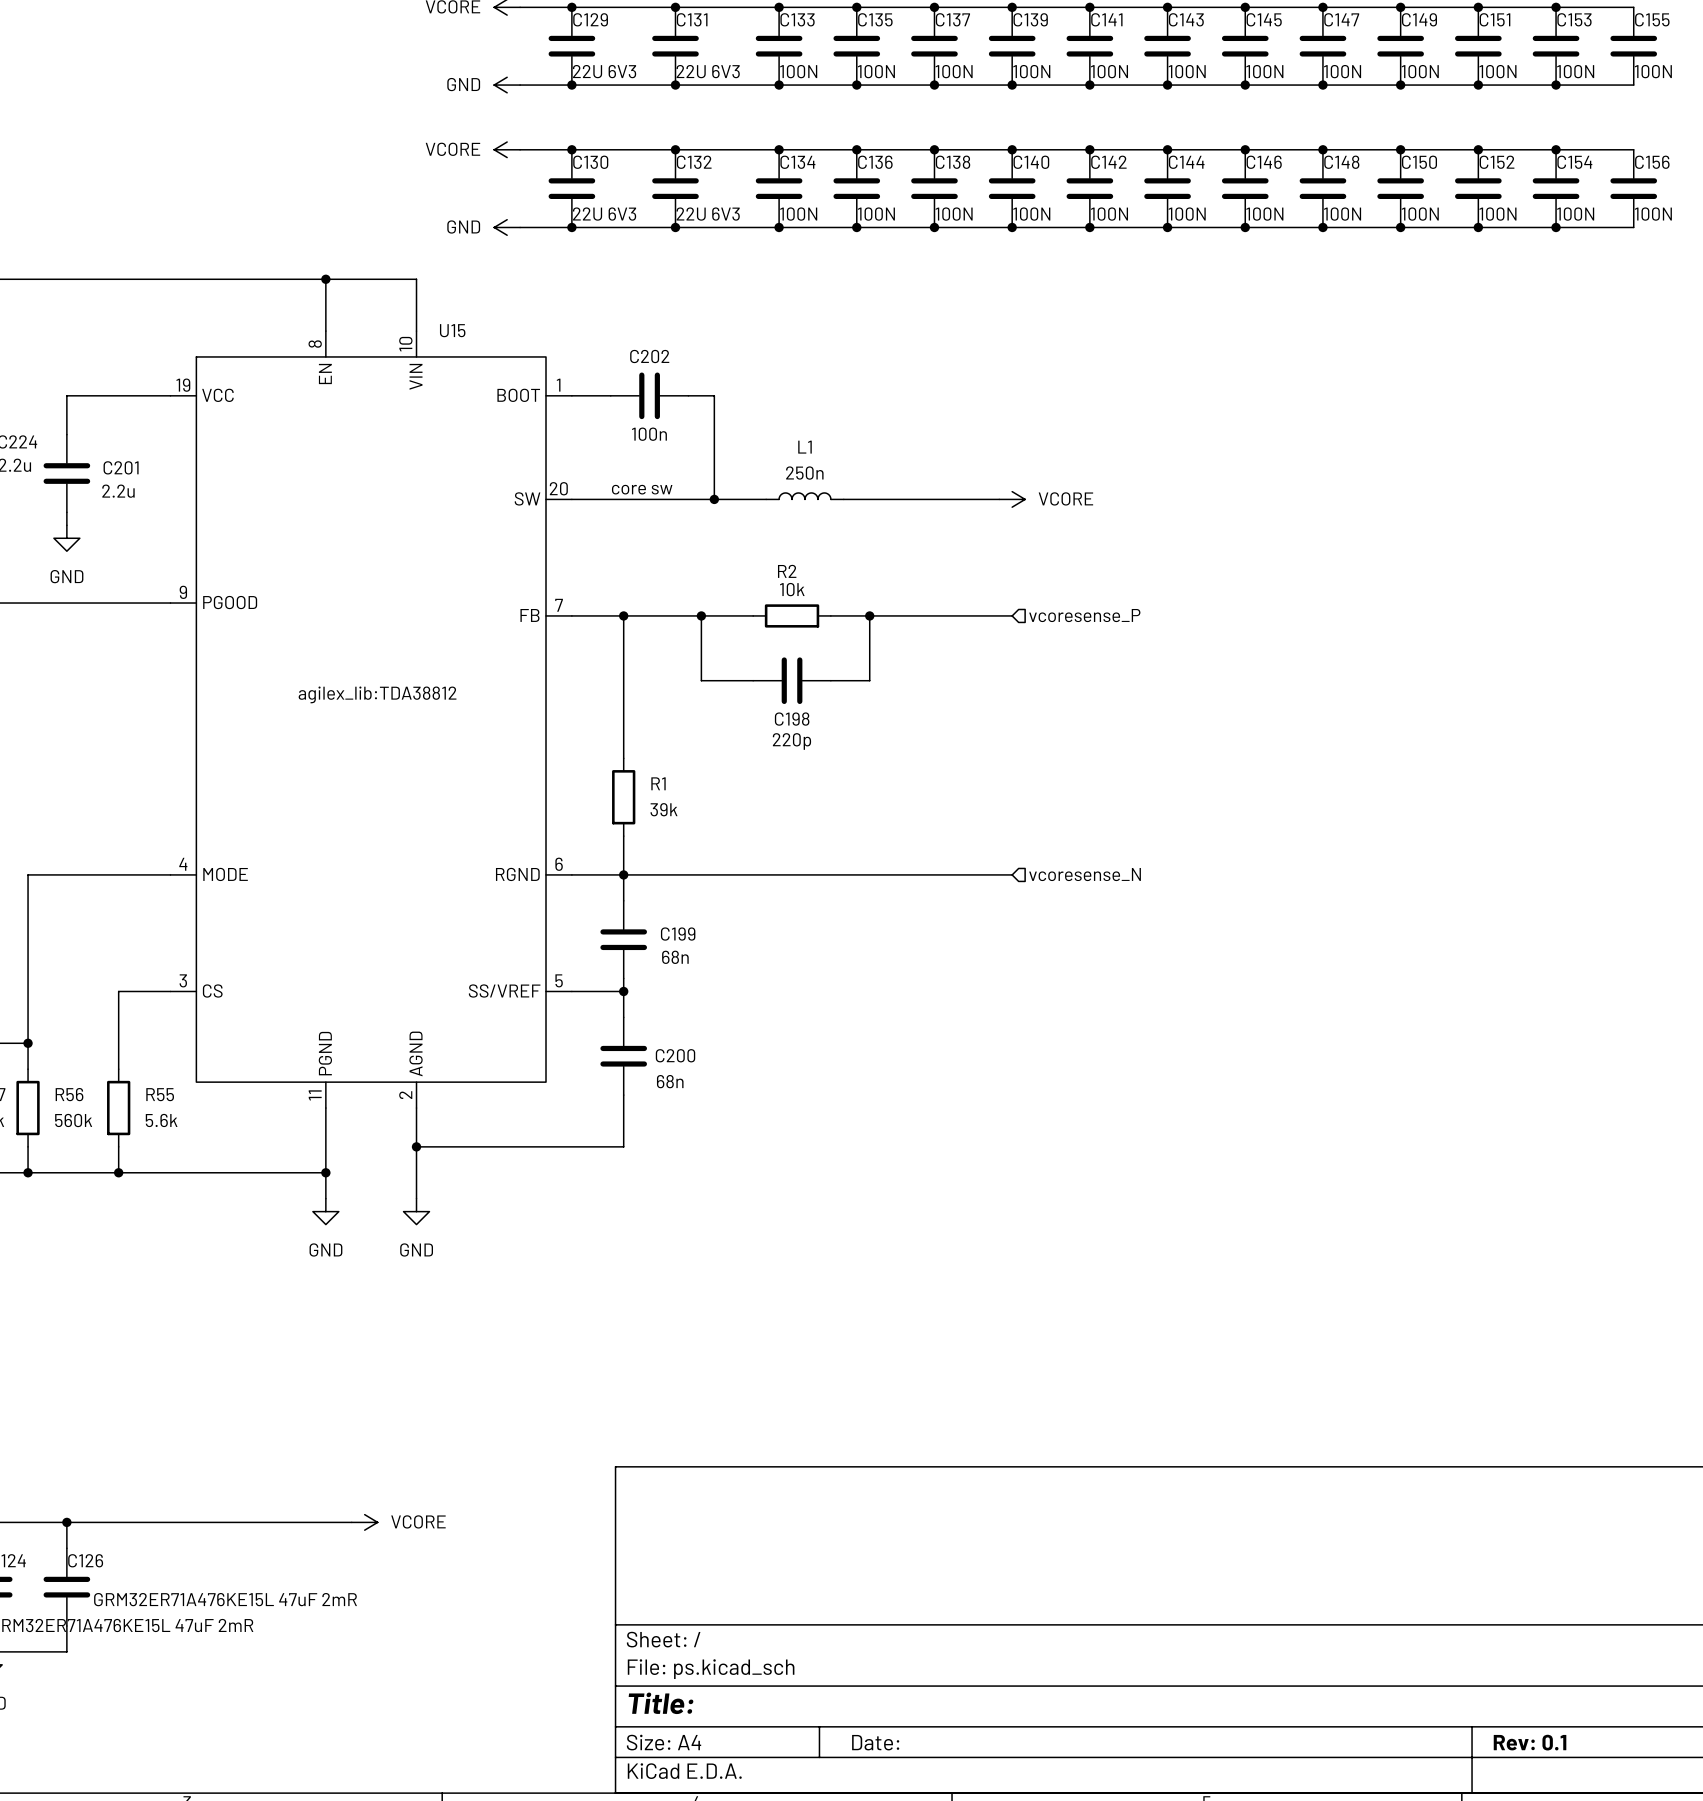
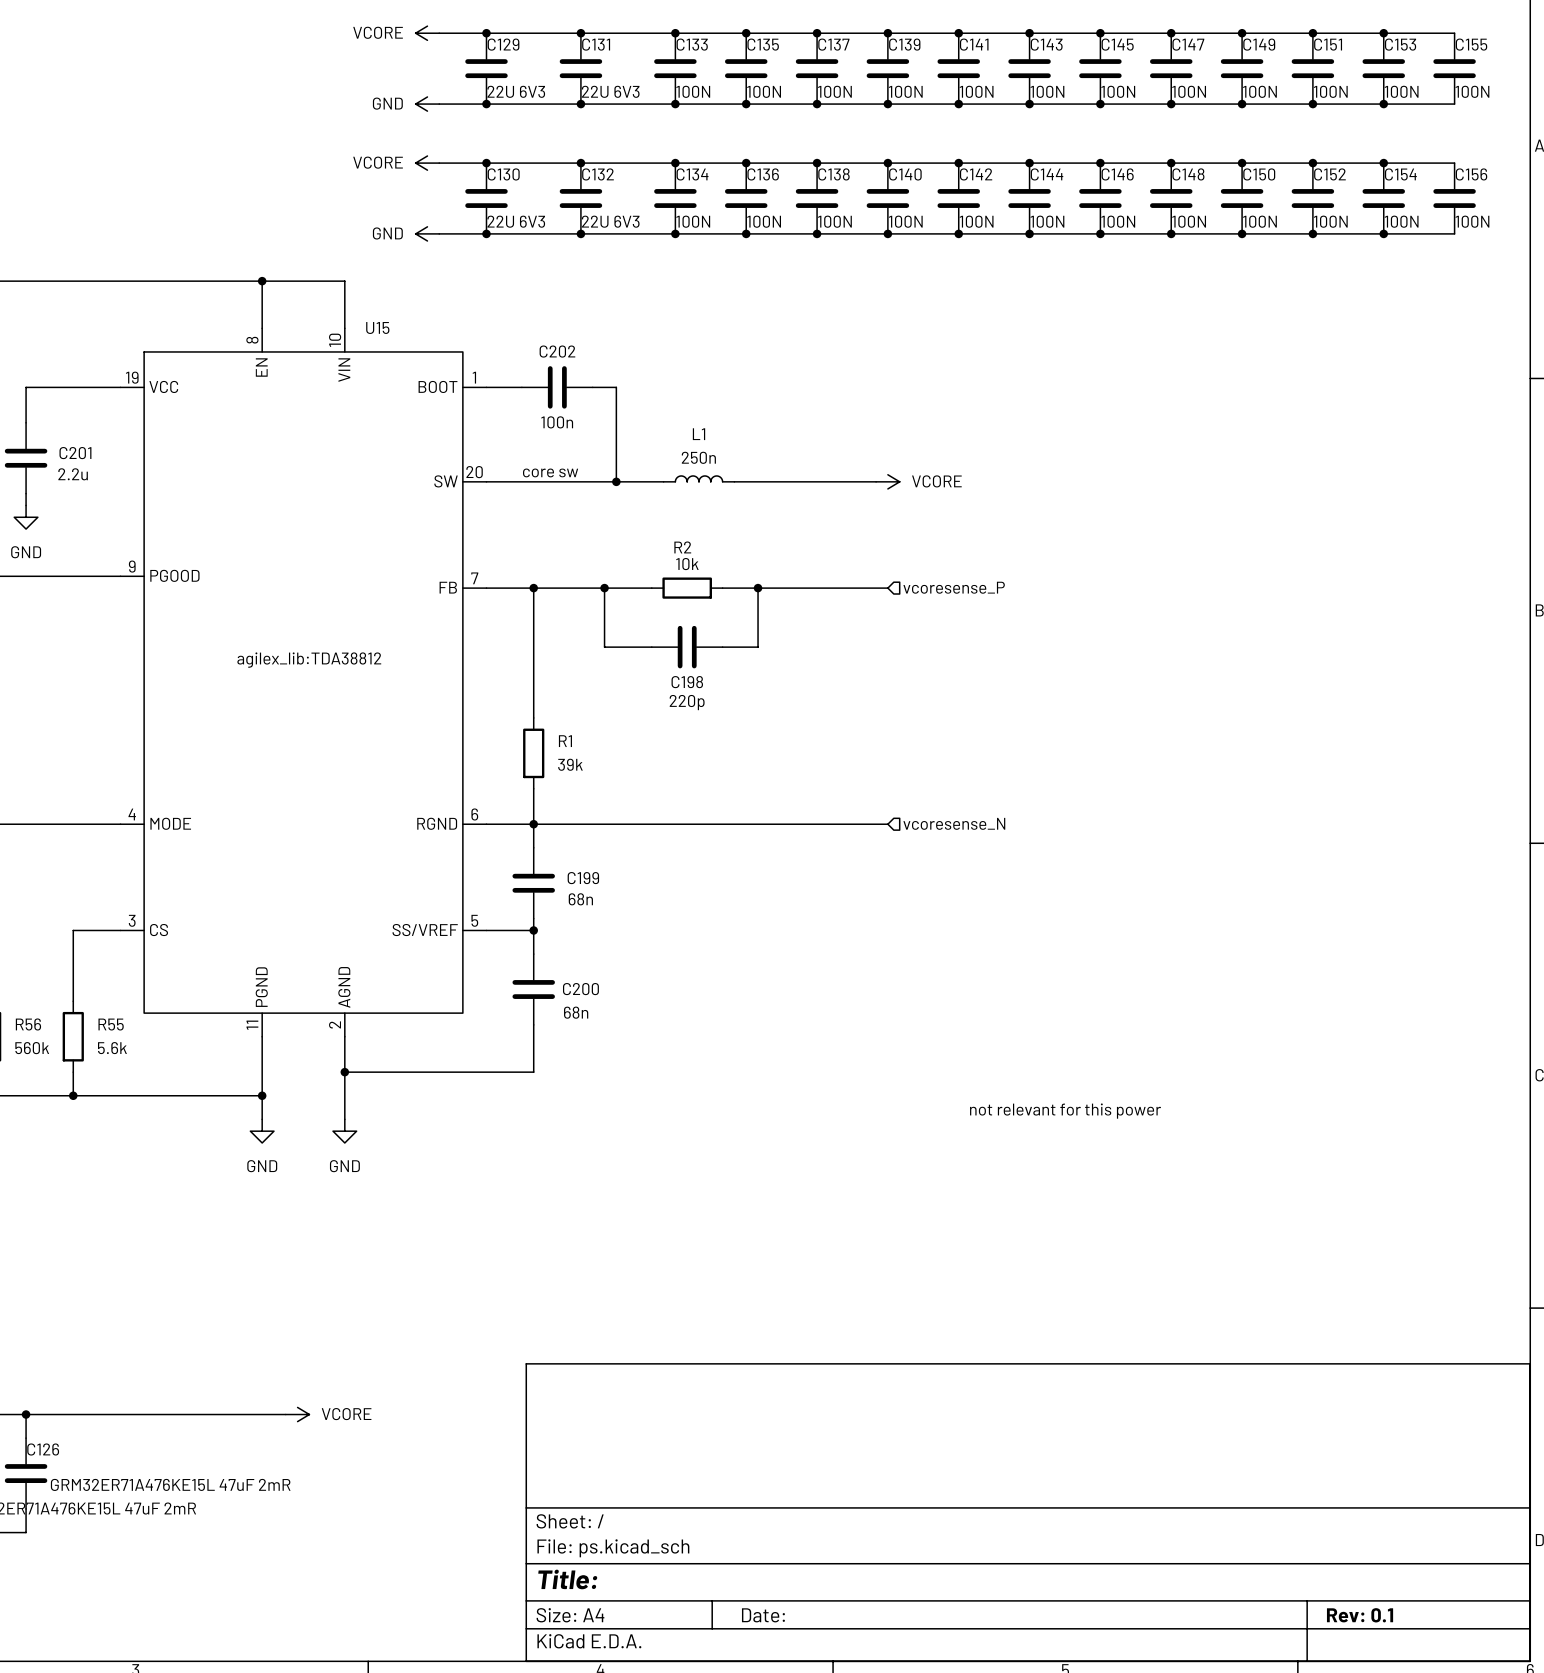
text: none -> not relevant for this power (1065, 1111)

